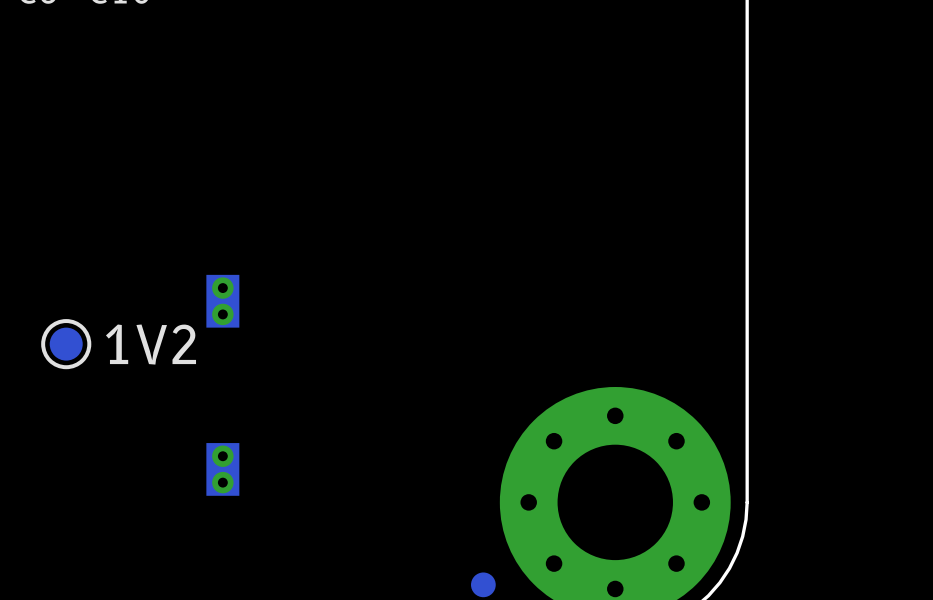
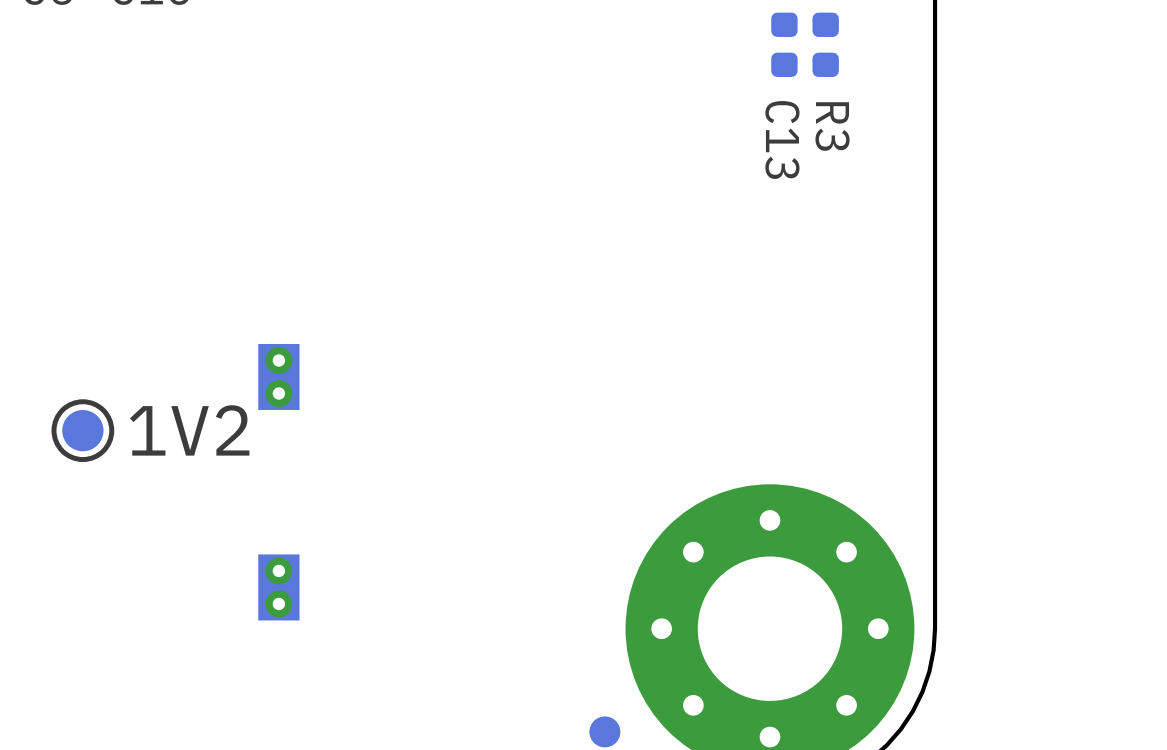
C13: none -> (784, 44)
R3: none -> (825, 44)

